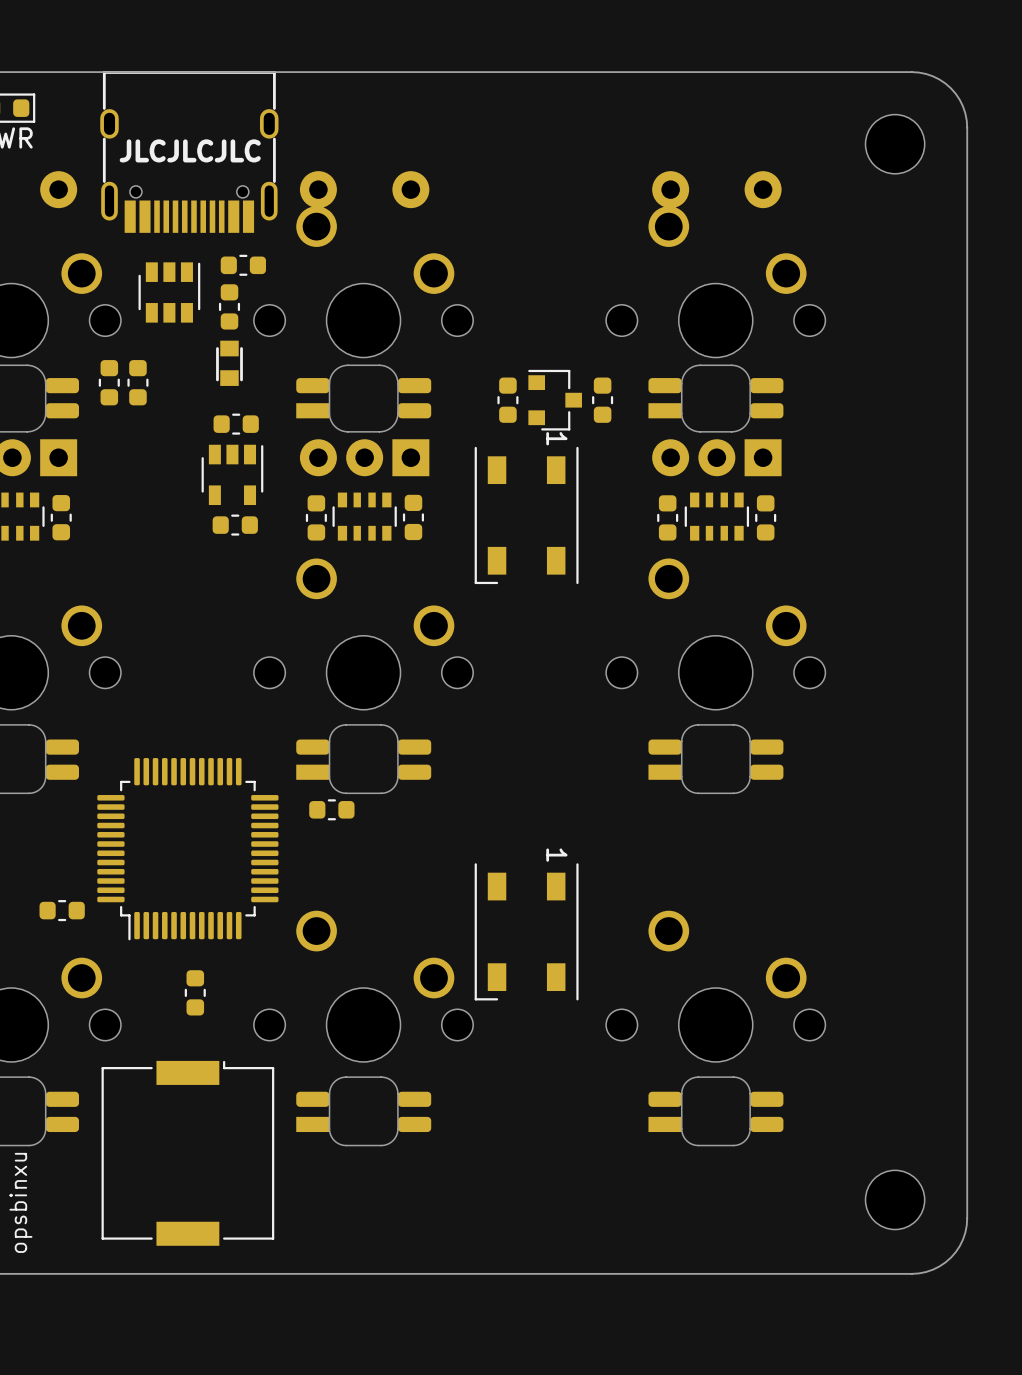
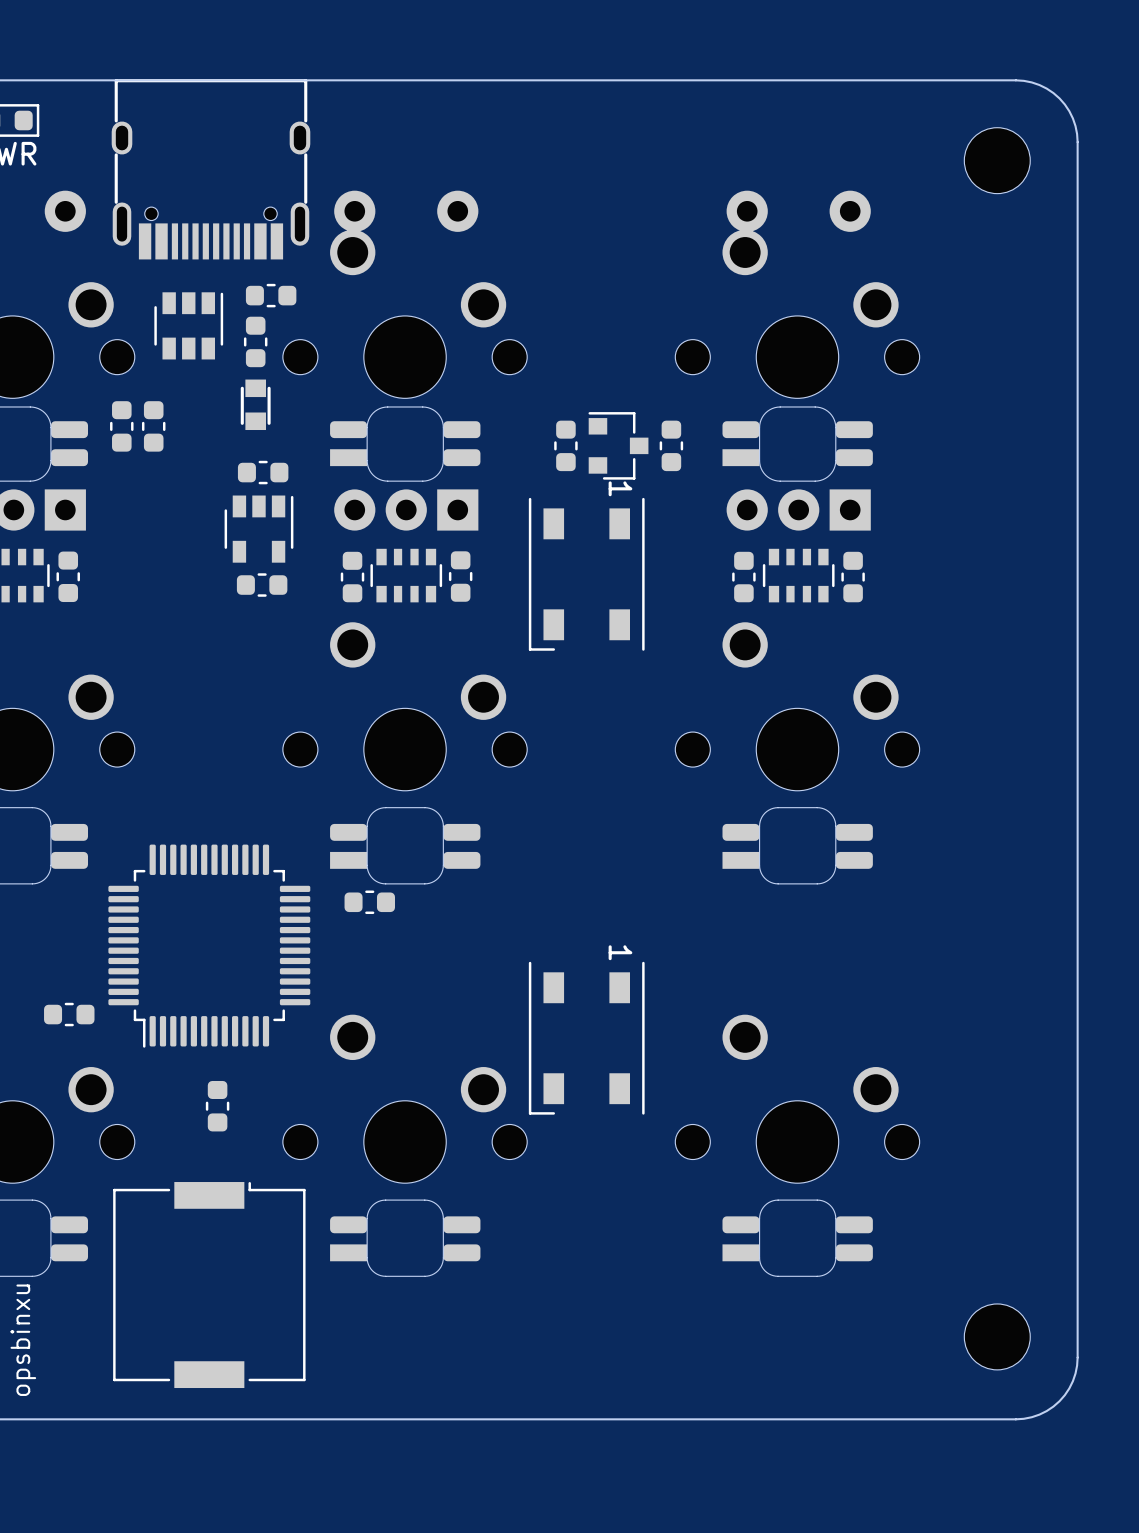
text: JLCJLCJLC (190, 150) -> none

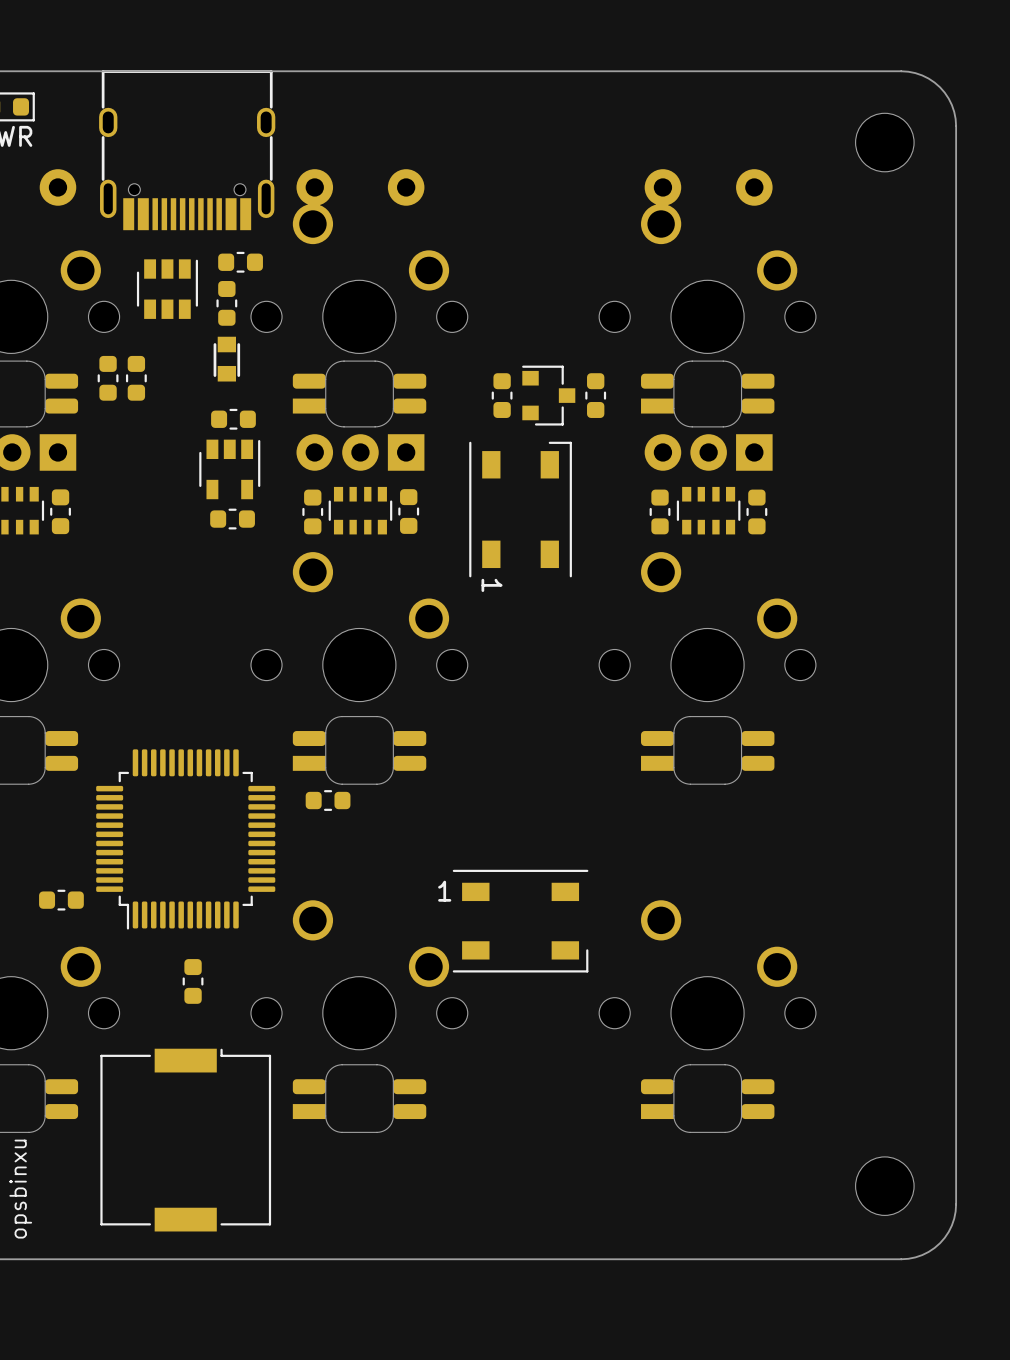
part rotation: 0° (586, 574) -> 180° (520, 509)
part rotation: 0° (586, 1038) -> 90° counterclockwise (520, 921)

